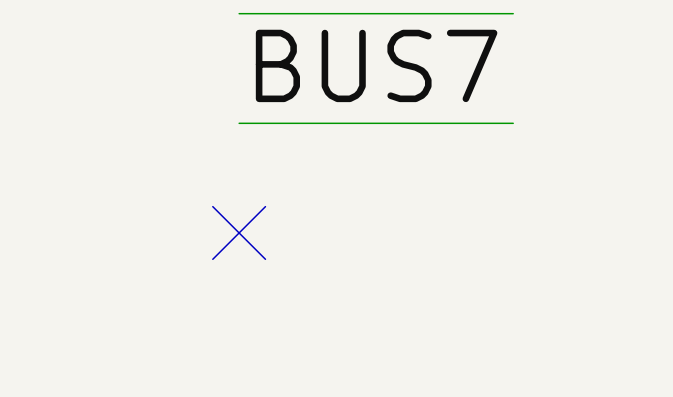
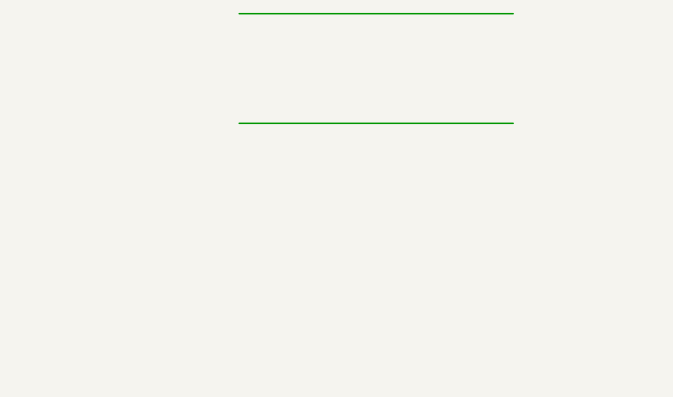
label: BUS7 (376, 65) -> none
no-connect mark: (239, 232) -> none

